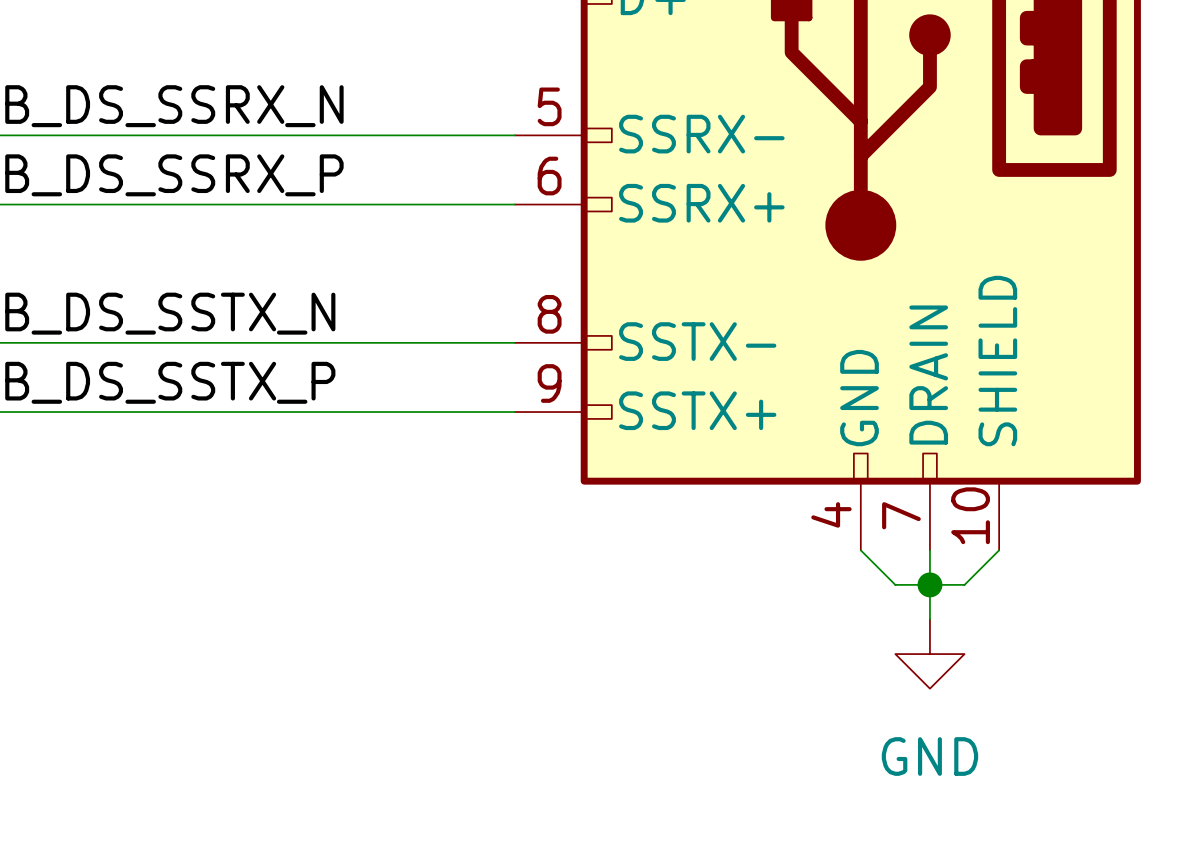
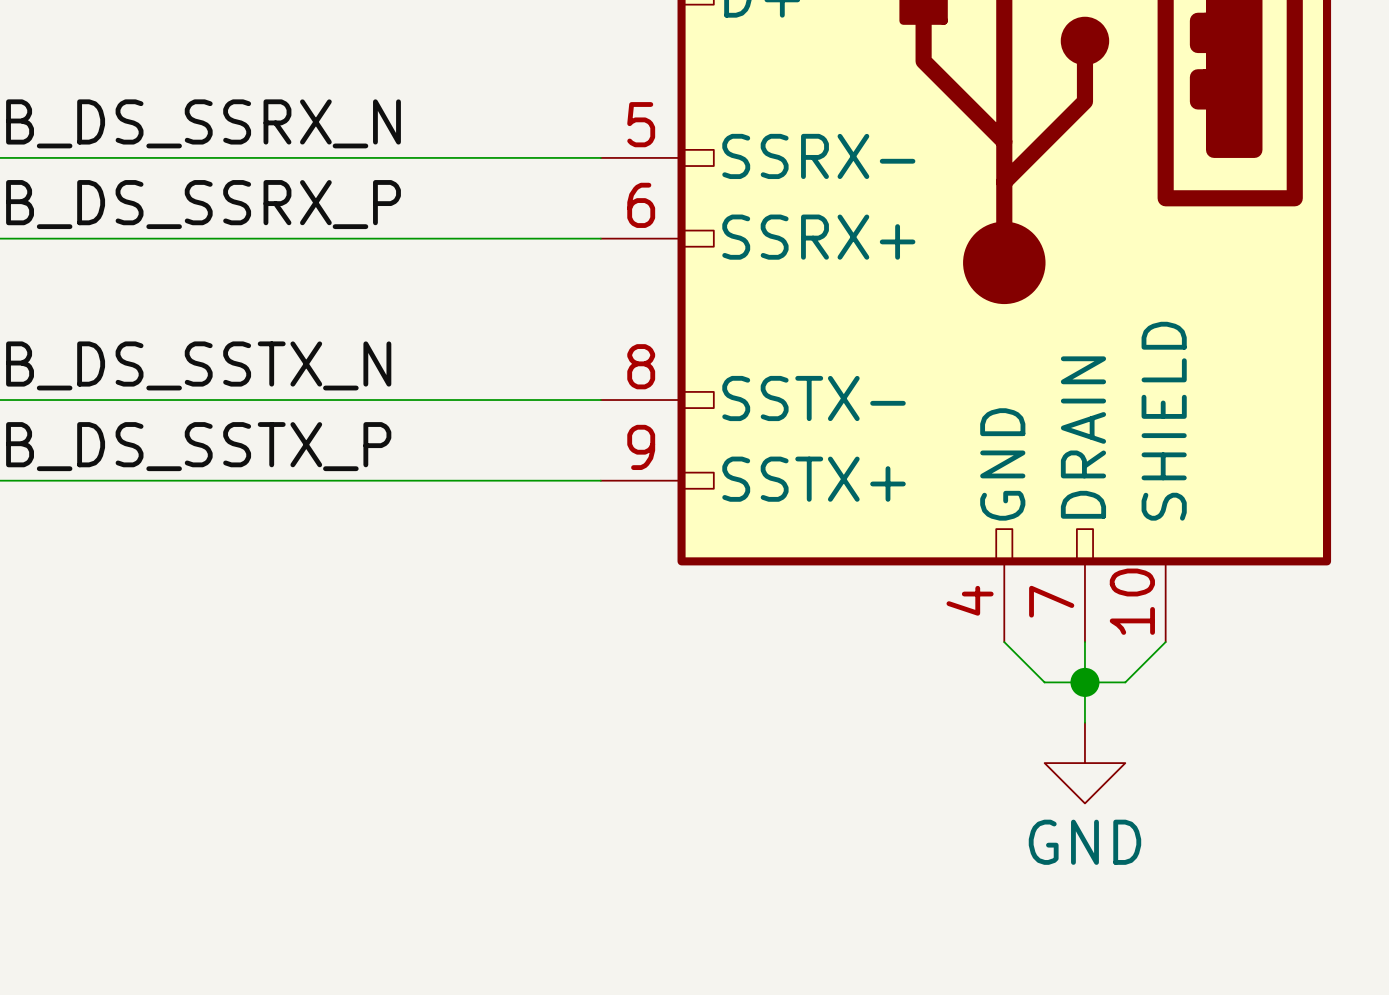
power symbol text position: GND (929, 756) -> GND (1084, 842)

